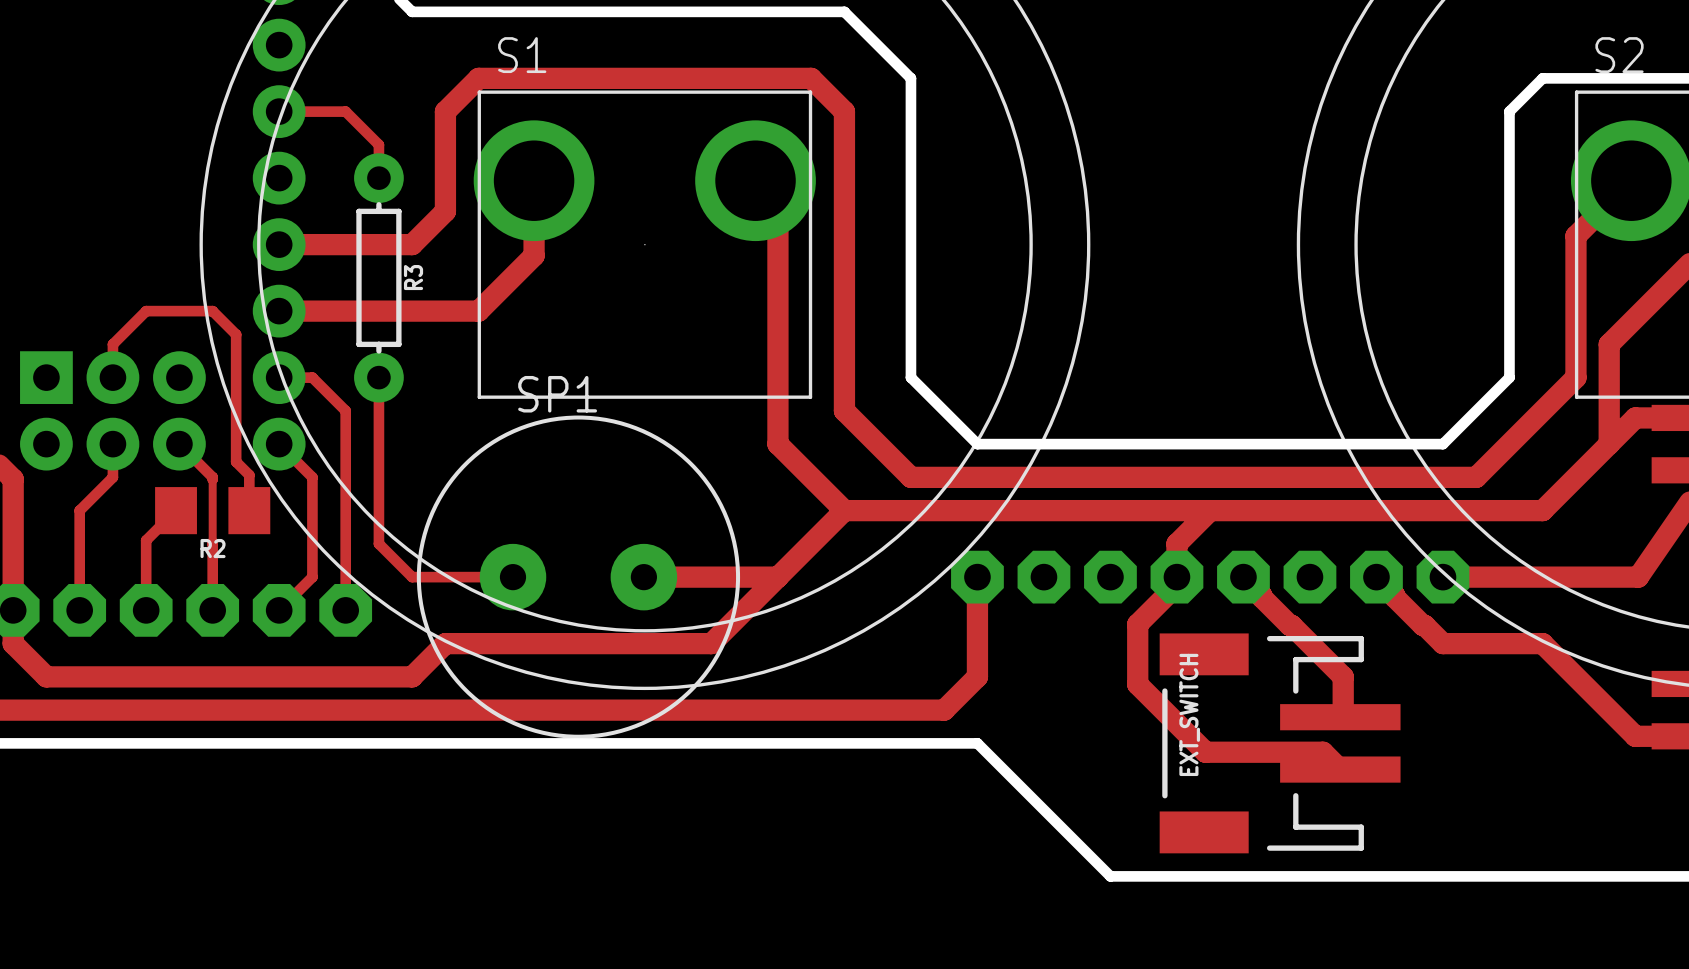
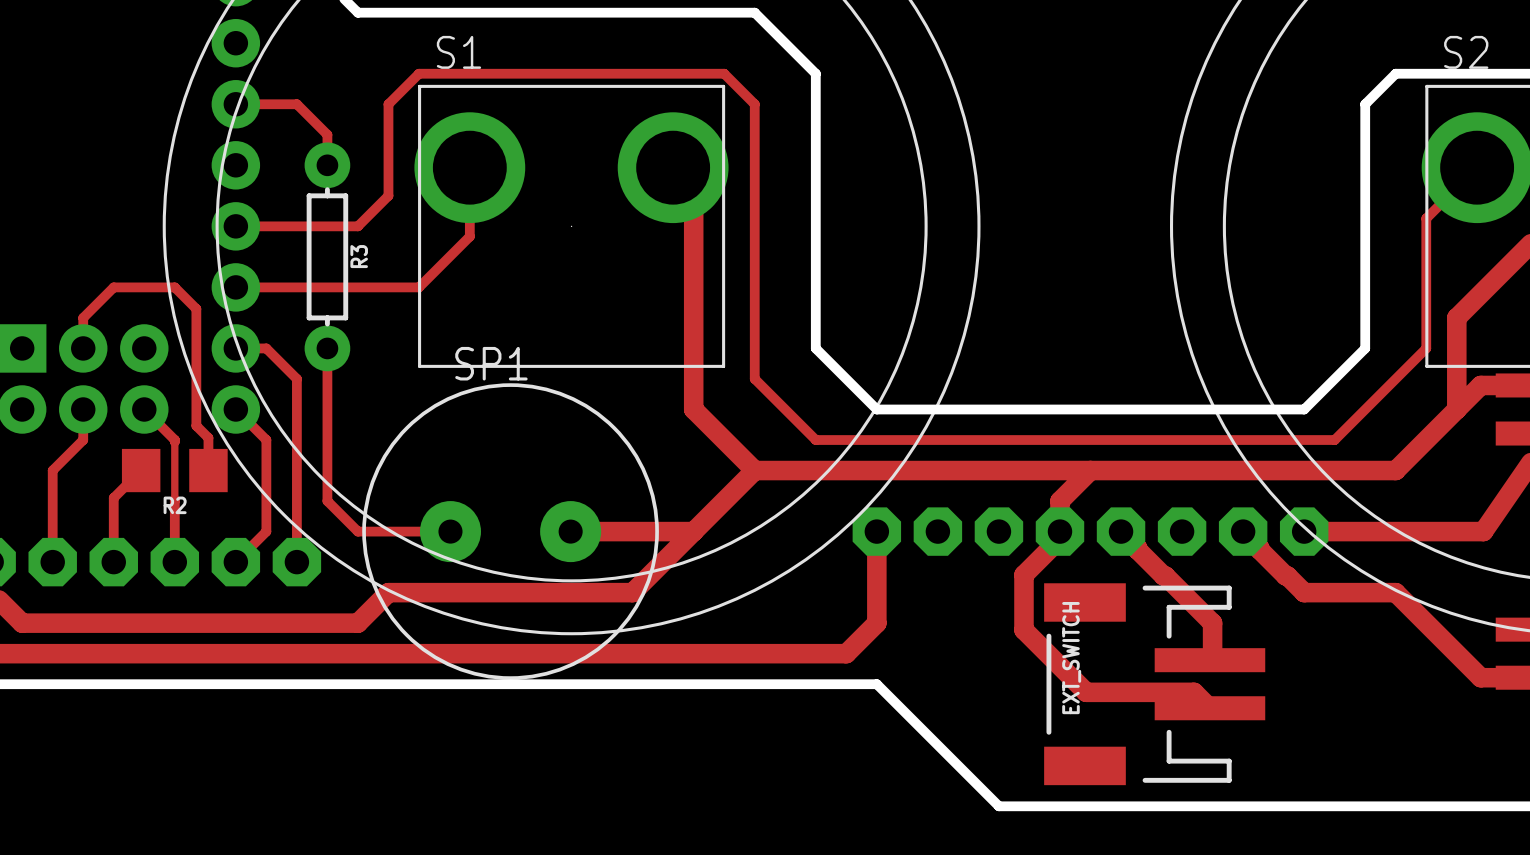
top track width: thick (534, 180) (534, 255) (478, 311) (279, 311) -> thin (469, 167) (469, 236) (418, 287) (235, 287)
top track width: thick (1631, 180) (1575, 236) (1575, 377) (1476, 477) (910, 477) (844, 410) (844, 111) (811, 78) (478, 78) (445, 111) (445, 211) (412, 244) (279, 244) -> thin (1477, 167) (1426, 218) (1426, 348) (1334, 440) (815, 440) (754, 378) (754, 104) (724, 73) (418, 73) (388, 104) (388, 195) (357, 226) (235, 226)

